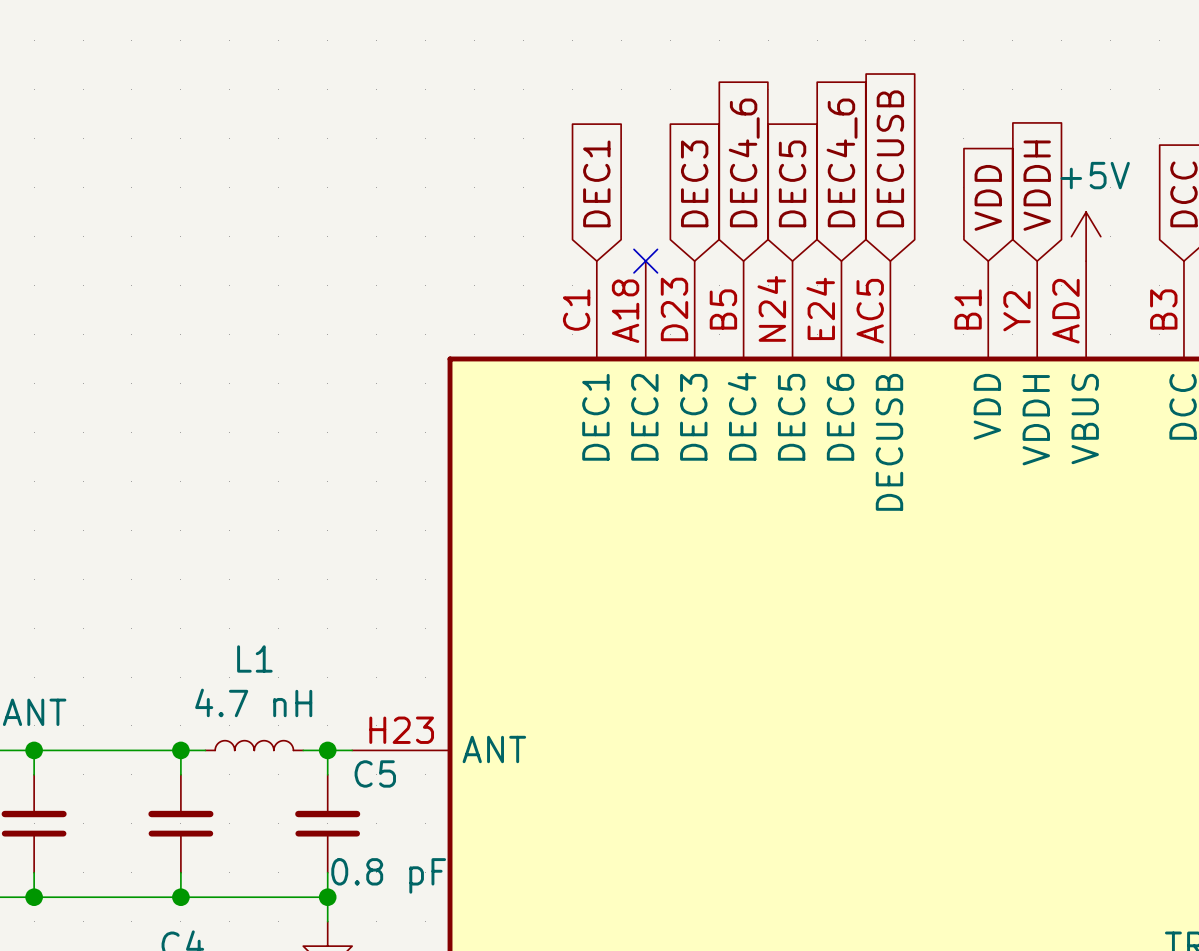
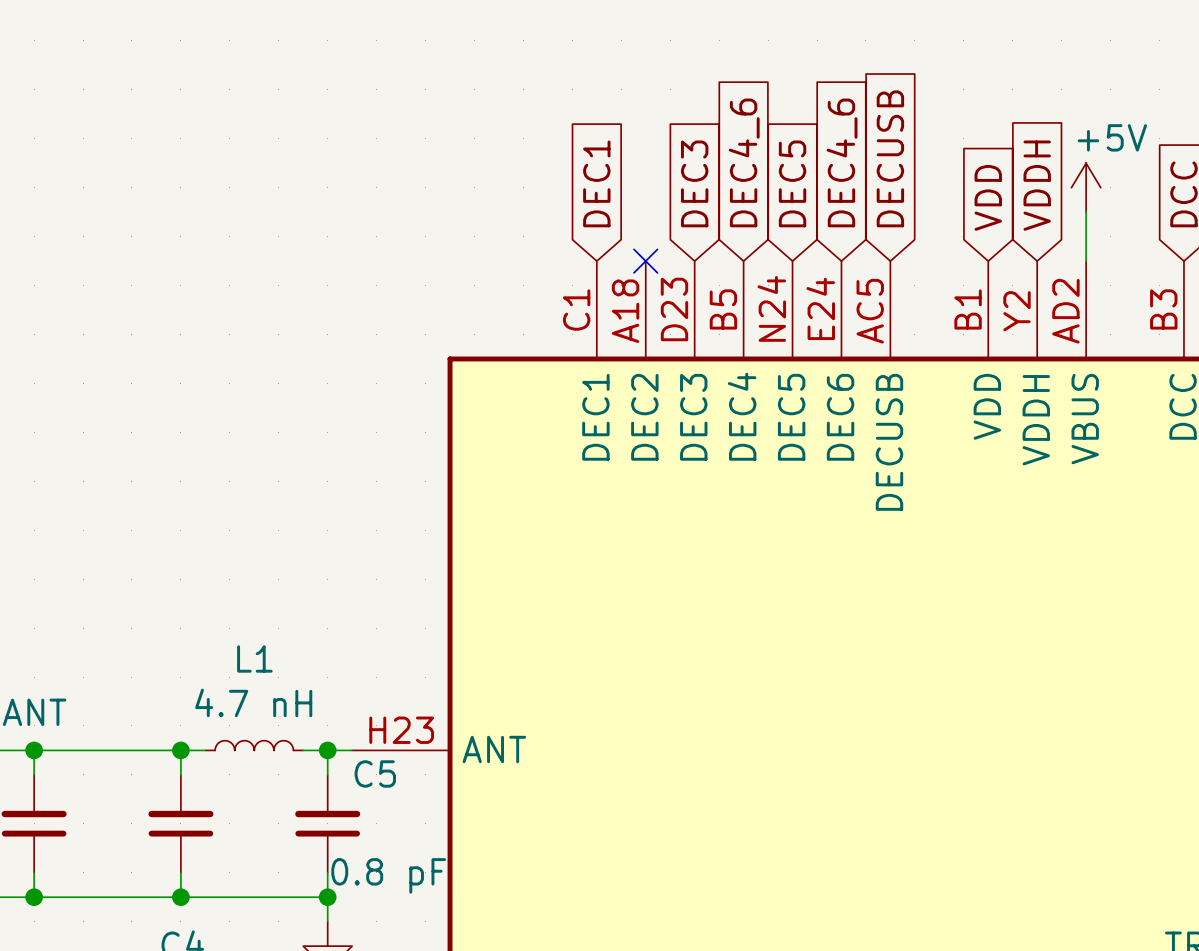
power symbol text position: +5V (1095, 175) -> +5V (1112, 137)
power symbol position: +5V (1086, 236) -> +5V (1086, 187)

